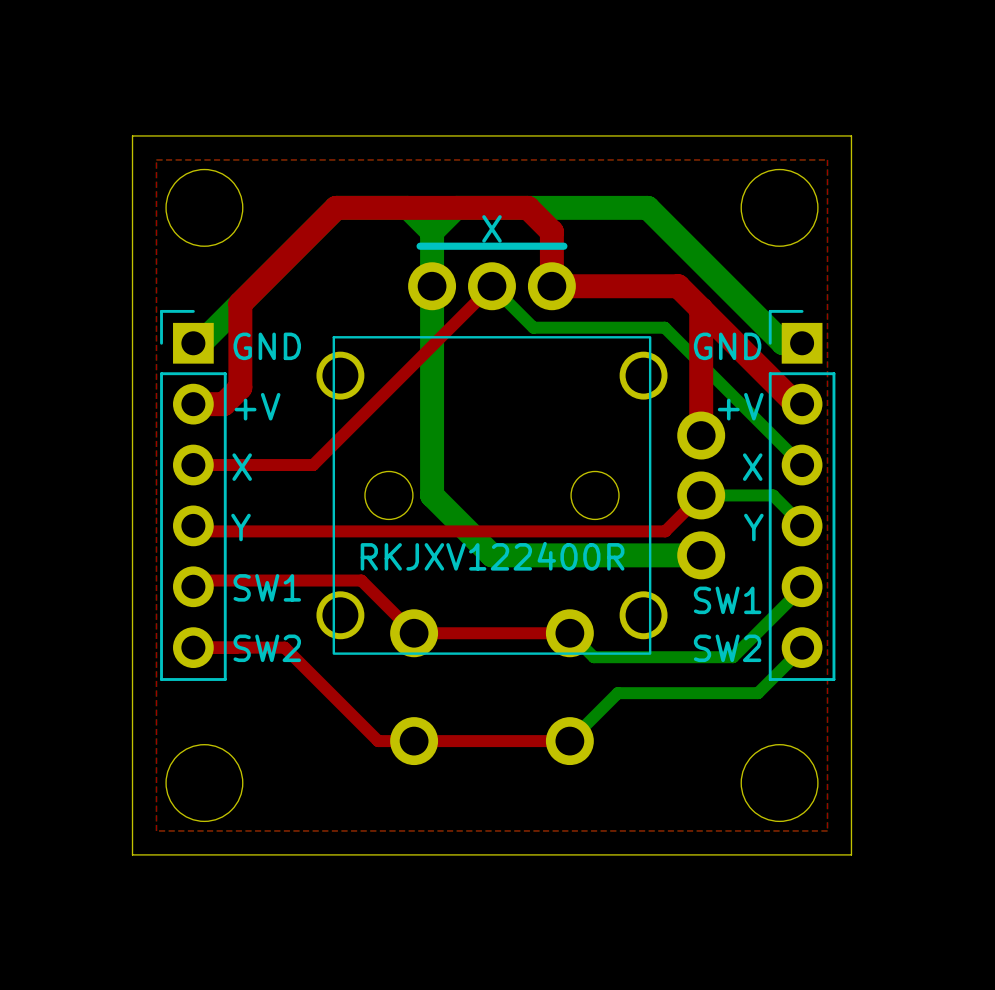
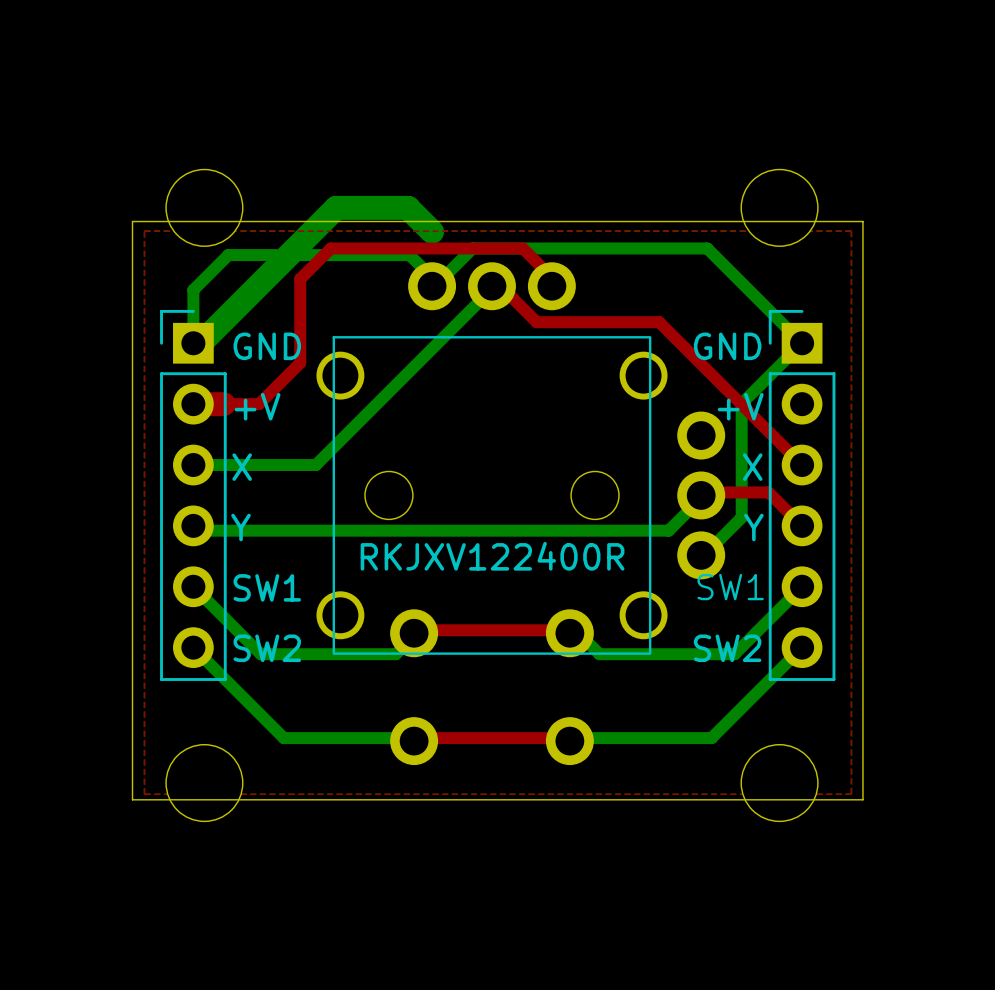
top zone outline: (156, 159) (827, 159) (827, 830) (156, 830) (156, 159) -> (144, 231) (144, 794) (851, 794) (851, 231) (144, 231)
board edge: (132, 221) (132, 135) (851, 135) (851, 854) (132, 854) (132, 799) -> (132, 221) (862, 221) (862, 799) (132, 799)
text: X (491, 228) -> none
line: (420, 246) (563, 246) -> none
top track: none -> (497, 283) (536, 322) (659, 322) (802, 465)
bottom track: none -> (497, 283) (315, 465) (193, 465)
top track: (491, 286) (313, 465) (180, 465) -> none
bottom track: (491, 286) (533, 327) (664, 327) (802, 465) -> none
top track: (701, 309) (701, 435) -> none
bottom track: none -> (193, 338) (193, 343) (193, 290) (228, 255) (409, 255) (437, 283) (472, 248) (707, 248) (802, 343) (741, 403) (741, 517) (706, 552)
bottom track: (803, 343) (783, 343) (647, 207) (456, 207) (432, 231) (432, 495) (491, 555) (701, 555) -> none
top track: (223, 404) (240, 387) (240, 303) (336, 207) (527, 207) (551, 231) (551, 286) (678, 286) (796, 404) (803, 404) -> (223, 404) (259, 404) (300, 362) (300, 279) (330, 248) (522, 248) (557, 283)
top track: none -> (706, 492) (768, 492) (802, 525)
bottom track: none -> (706, 492) (668, 530) (198, 530) (193, 525)
top track: (701, 495) (665, 531) (198, 531) (193, 525) -> none
bottom track: (701, 495) (773, 495) (803, 525) -> none
top track: (193, 586) (199, 580) (361, 580) (414, 633) (569, 633) -> none
bottom track: none -> (193, 586) (260, 654) (395, 654) (419, 630)
bottom track: none -> (802, 586) (734, 654) (599, 654) (575, 630)
bottom track: (803, 586) (733, 657) (593, 657) (569, 633) -> none
text position: SW1 (727, 600) -> SW1 (730, 587)
top track: none -> (419, 630) (575, 630)
top track: (180, 647) (284, 647) (378, 741) (569, 741) -> none
bottom track: none -> (193, 647) (283, 738) (419, 738)
bottom track: none -> (802, 647) (711, 738) (575, 738)
bottom track: (803, 647) (758, 693) (617, 693) (569, 741) -> none
top track: none -> (419, 738) (575, 738)

